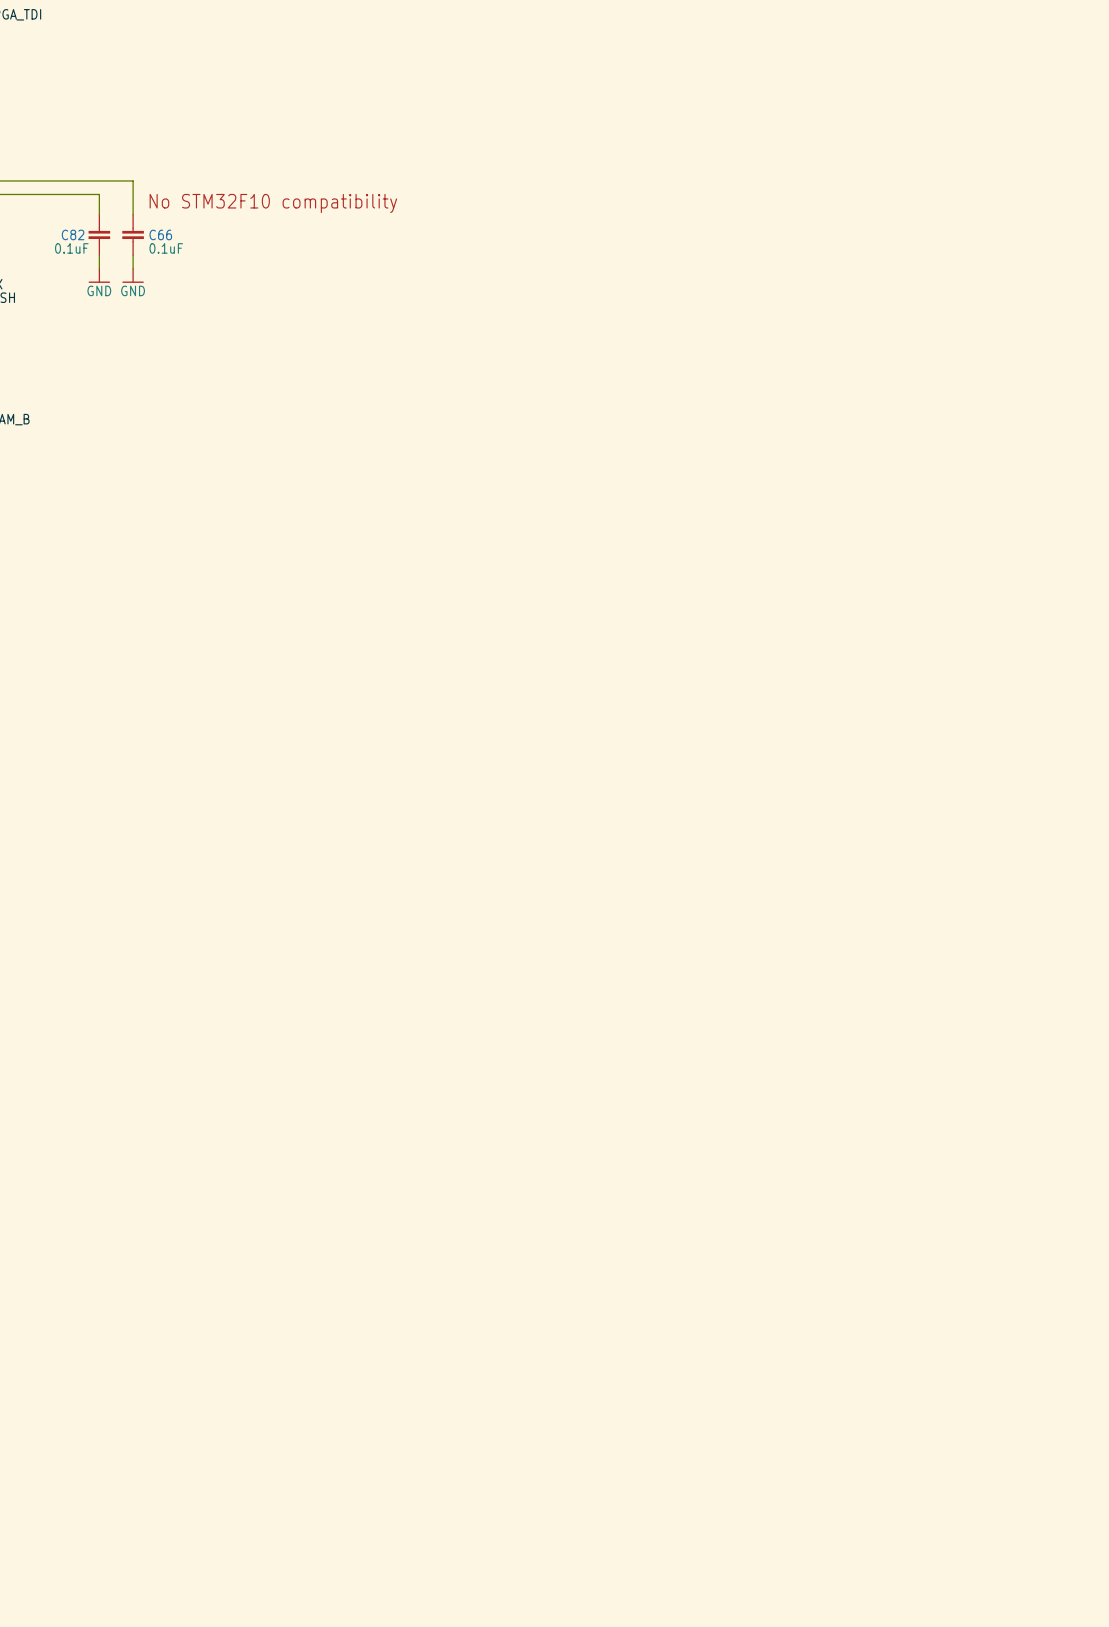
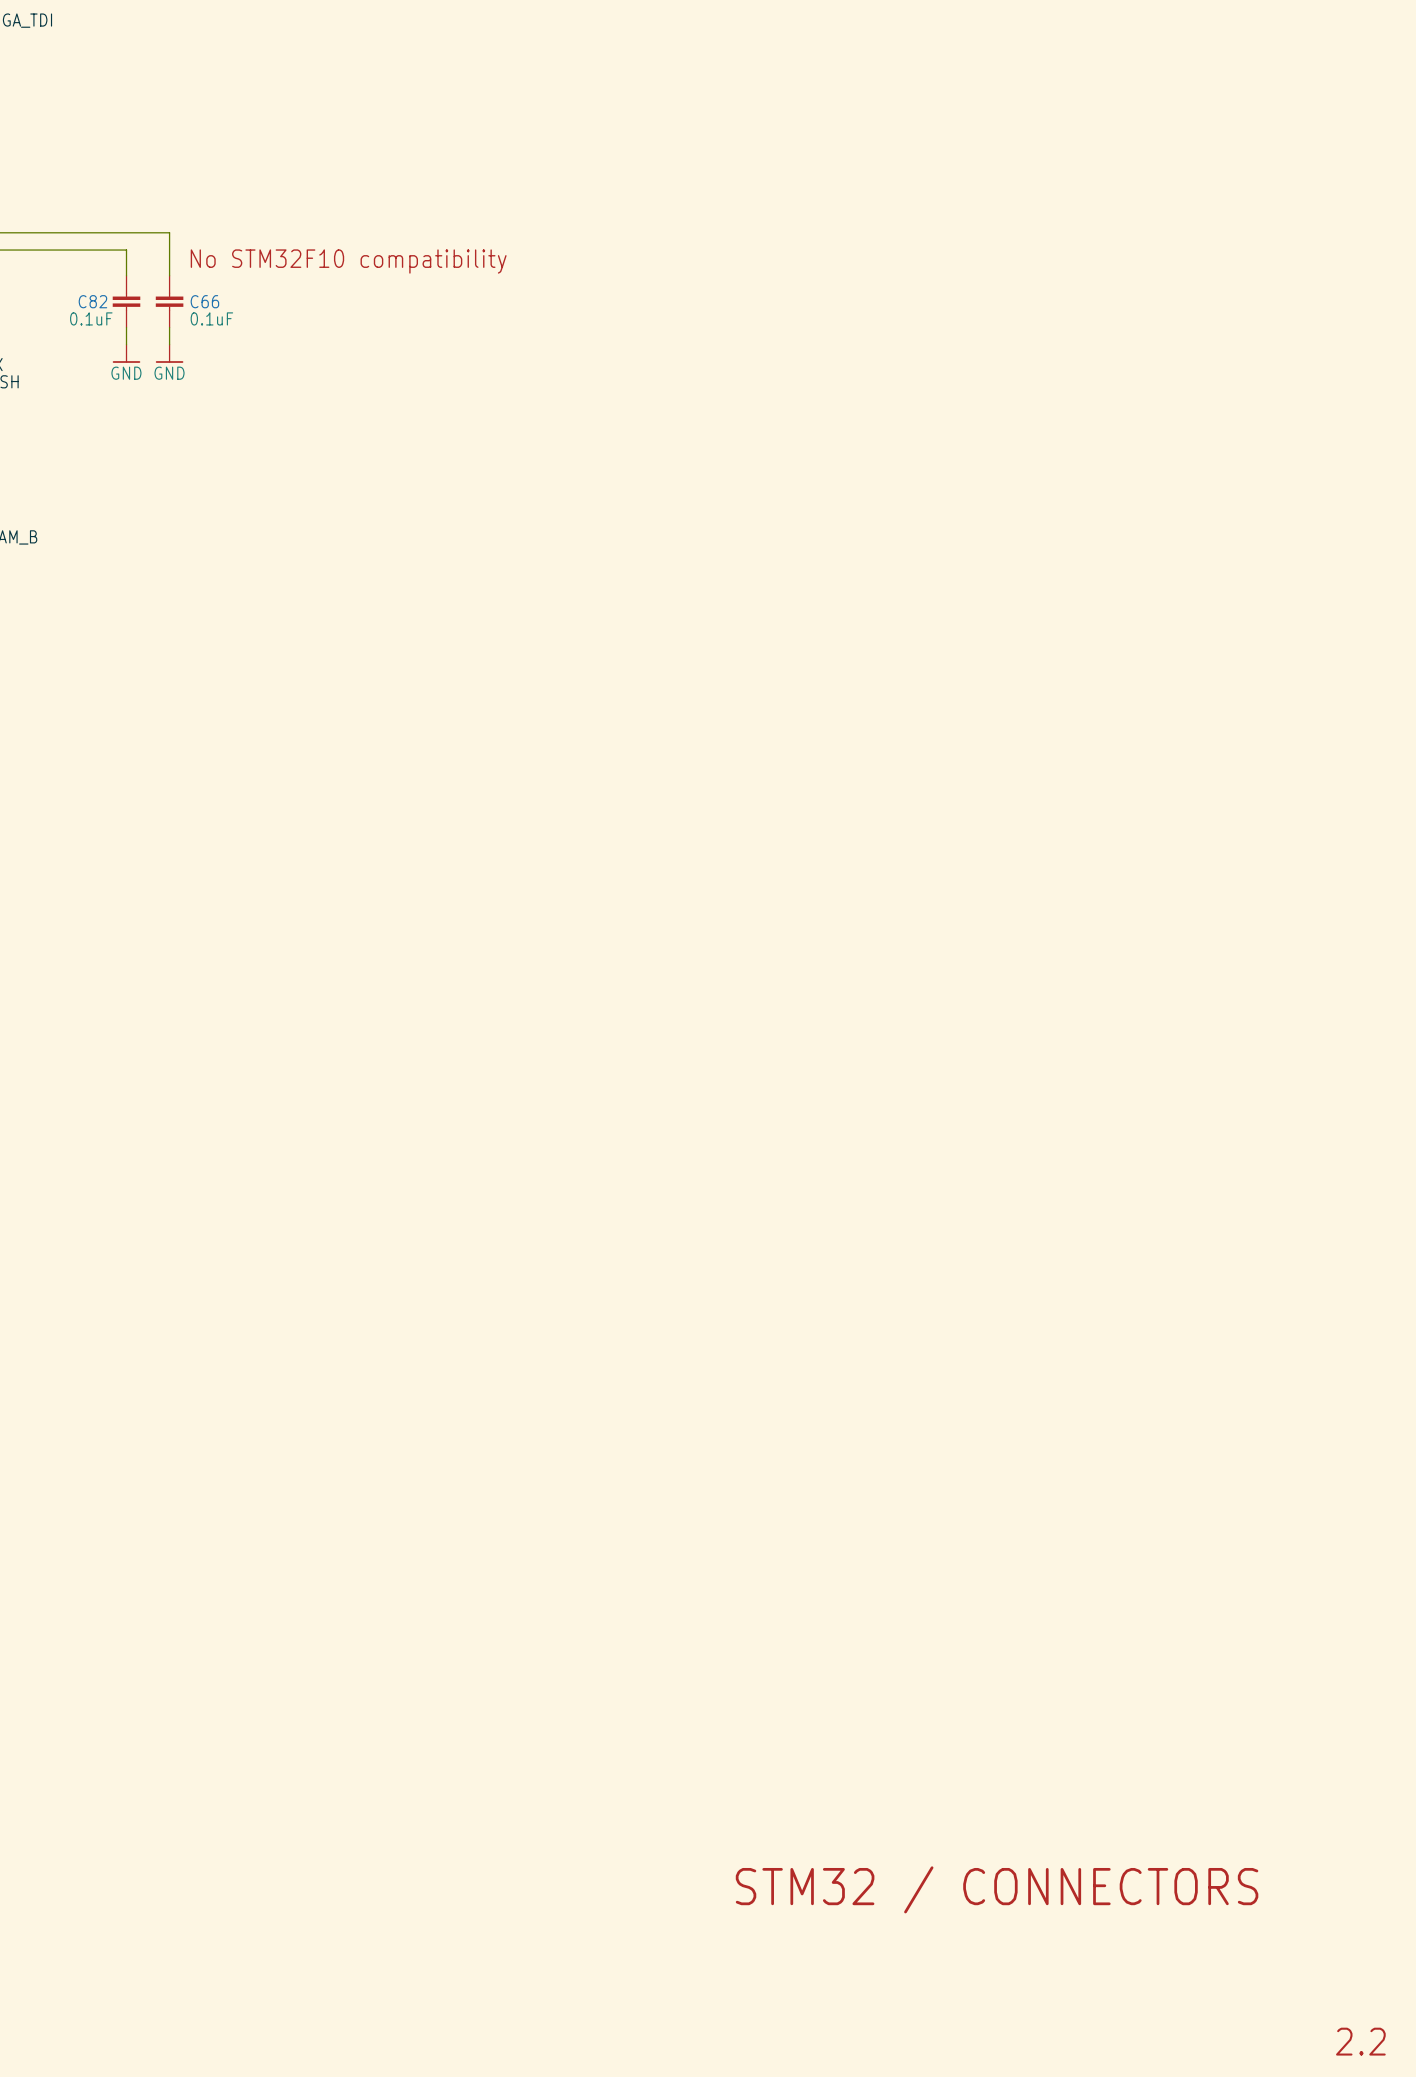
text: none -> STM32 / CONNECTORS (997, 1889)
text: none -> 2.2 (1360, 2041)

